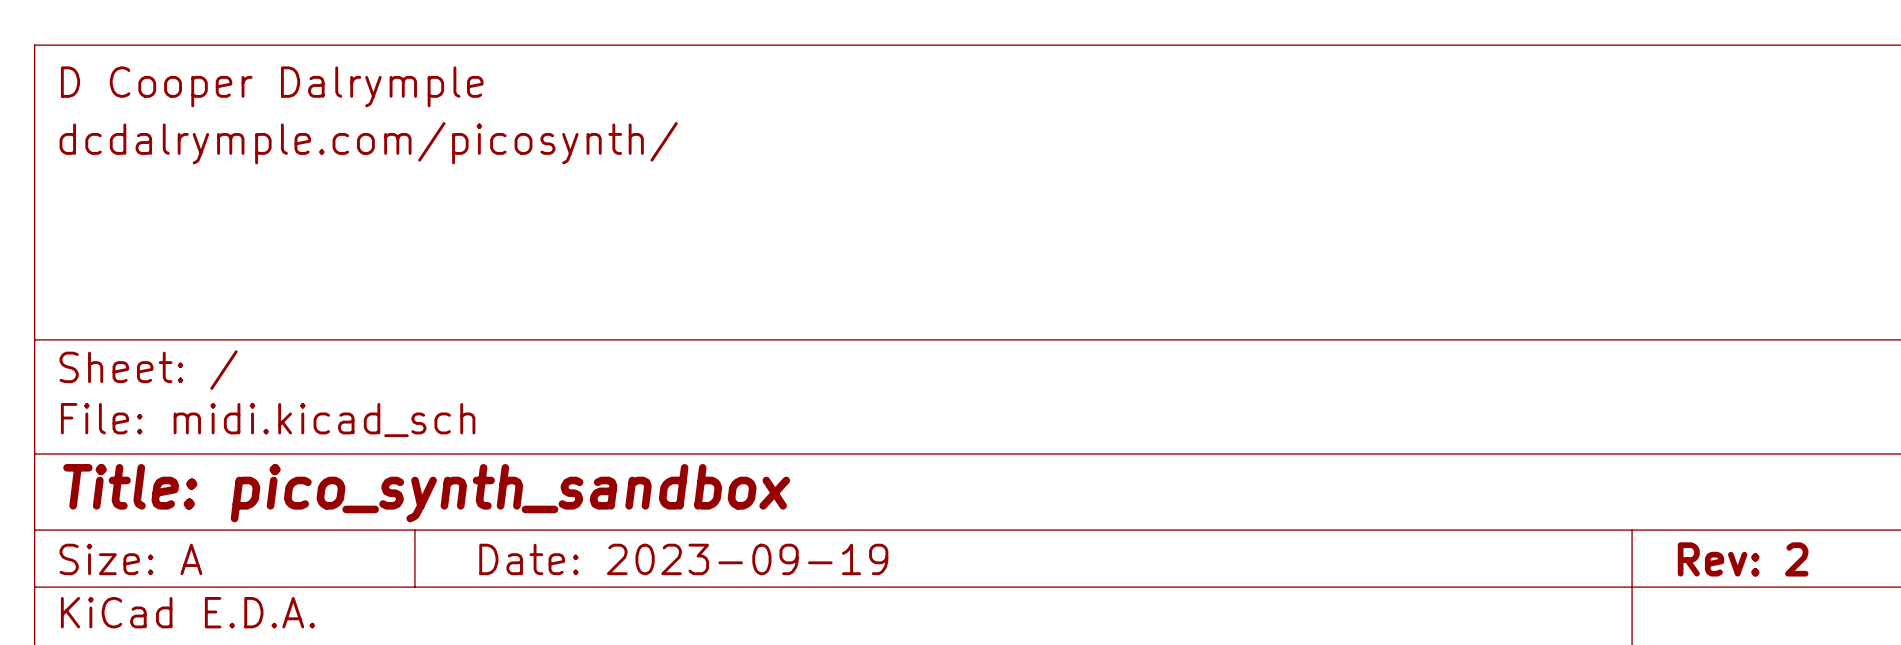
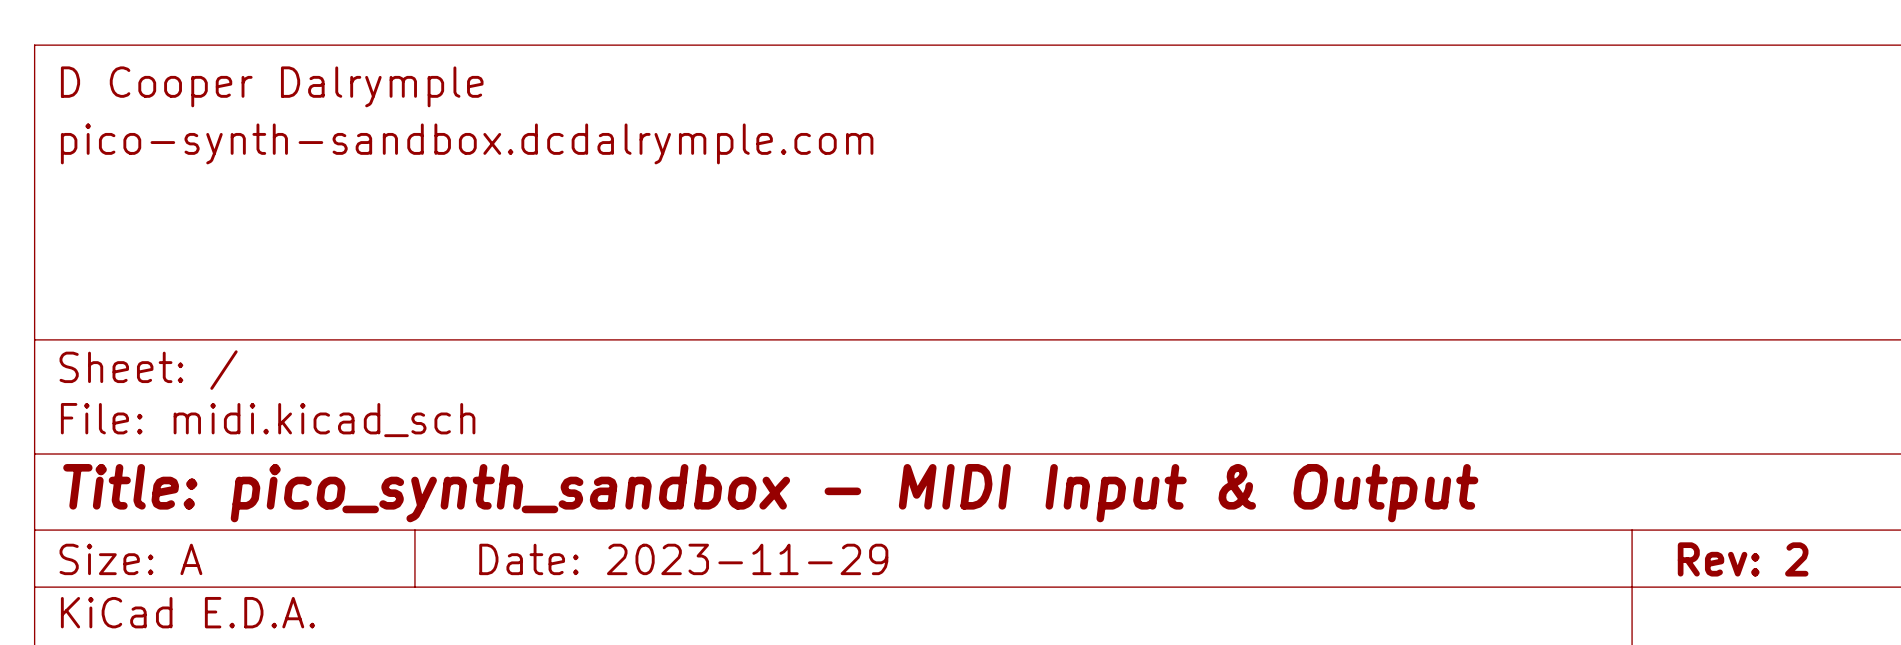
title block: dcdalrymple.com/picosynth/ (368, 143) -> pico-synth-sandbox.dcdalrymple.com (467, 143)
title block: Title: pico_synth_sandbox (426, 493) -> Title: pico_synth_sandbox - MIDI Input & Output (770, 493)
title block: Date: 2023-09-19 (683, 559) -> Date: 2023-11-29 (683, 559)

